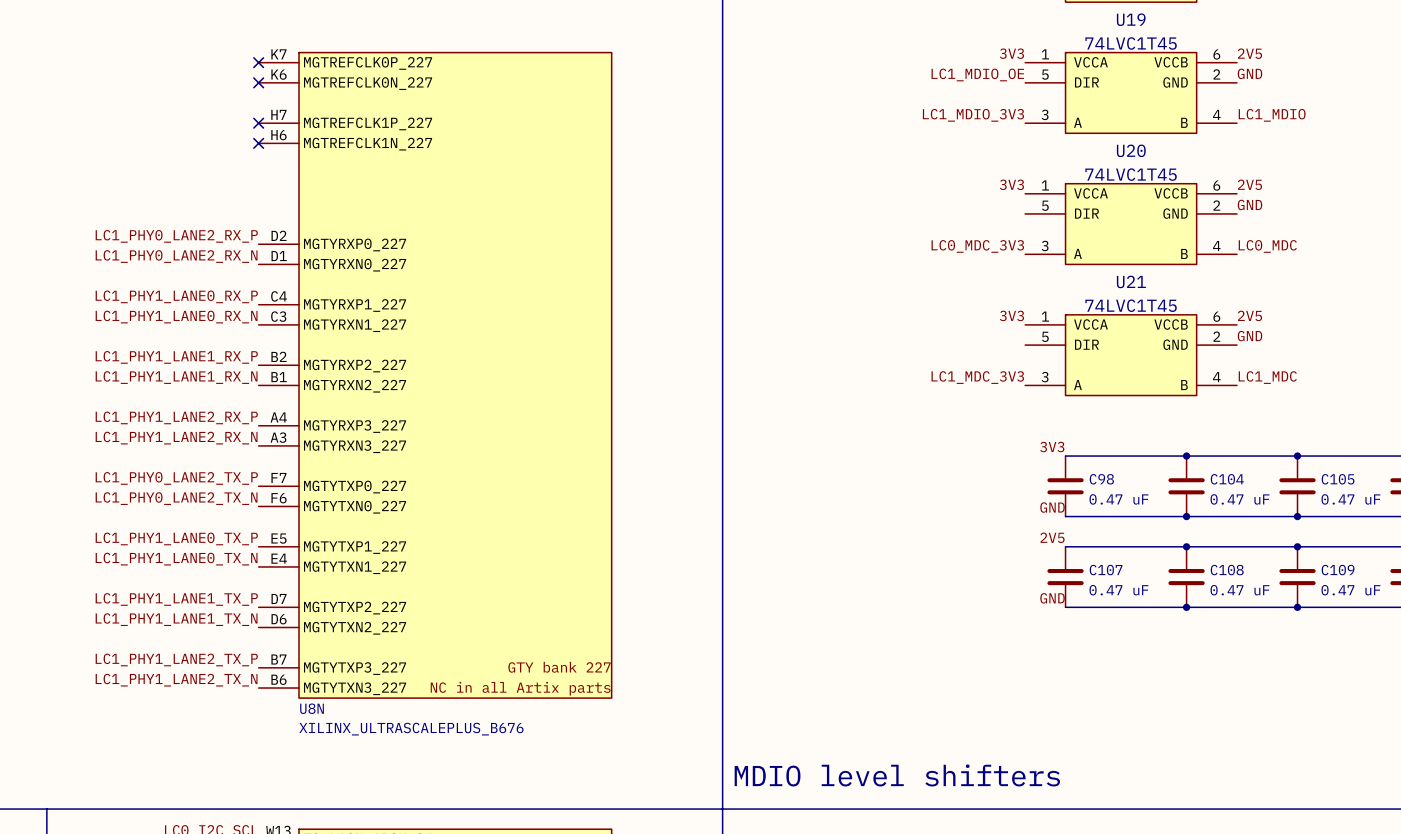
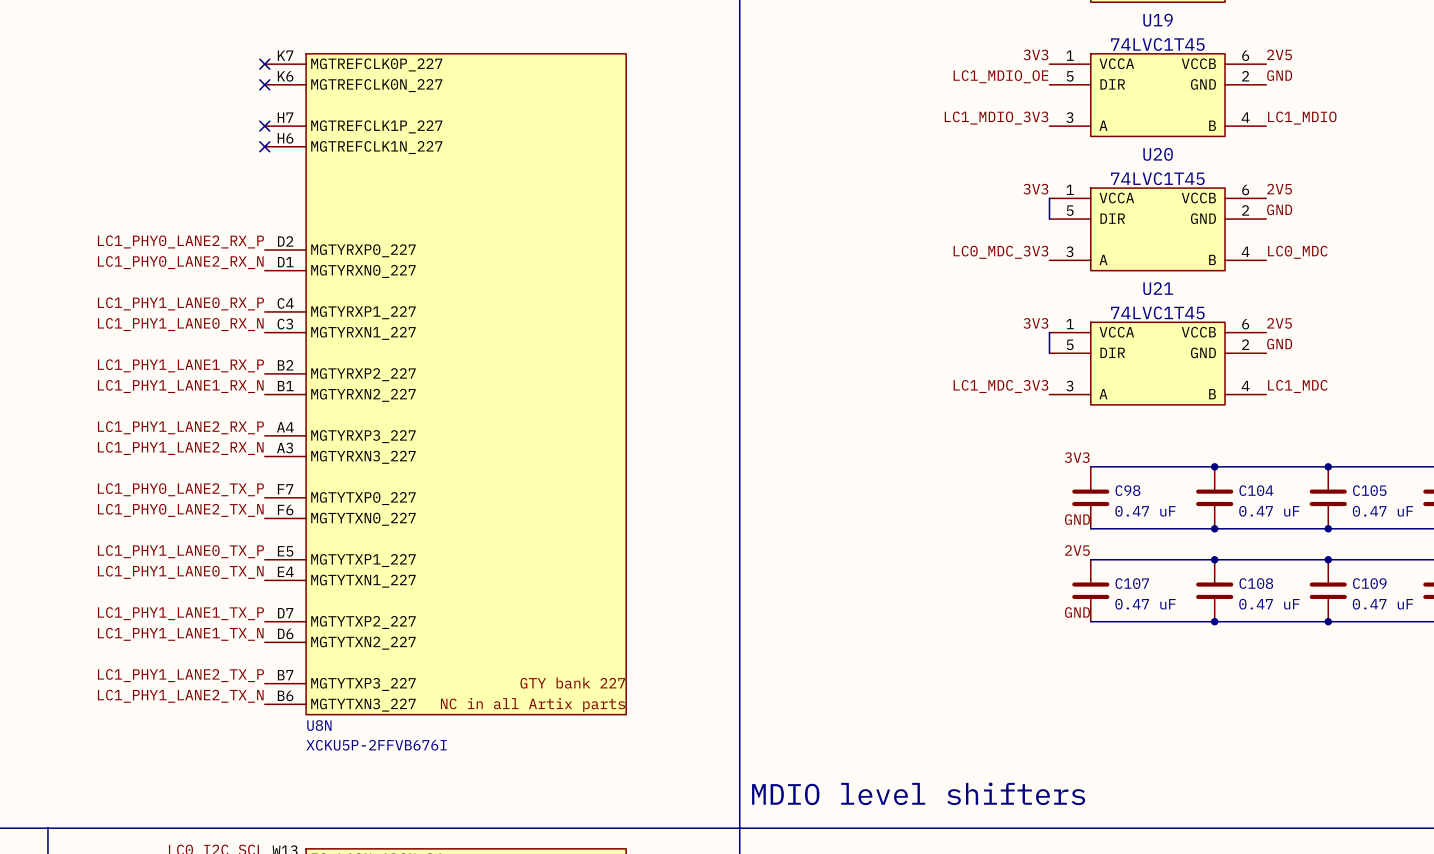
wire: none -> (1049, 198) (1049, 219)
wire: none -> (1049, 332) (1049, 353)
U8N value: XILINX_ULTRASCALEPLUS_B676 (411, 729) -> XCKU5P-2FFVB676I (376, 745)

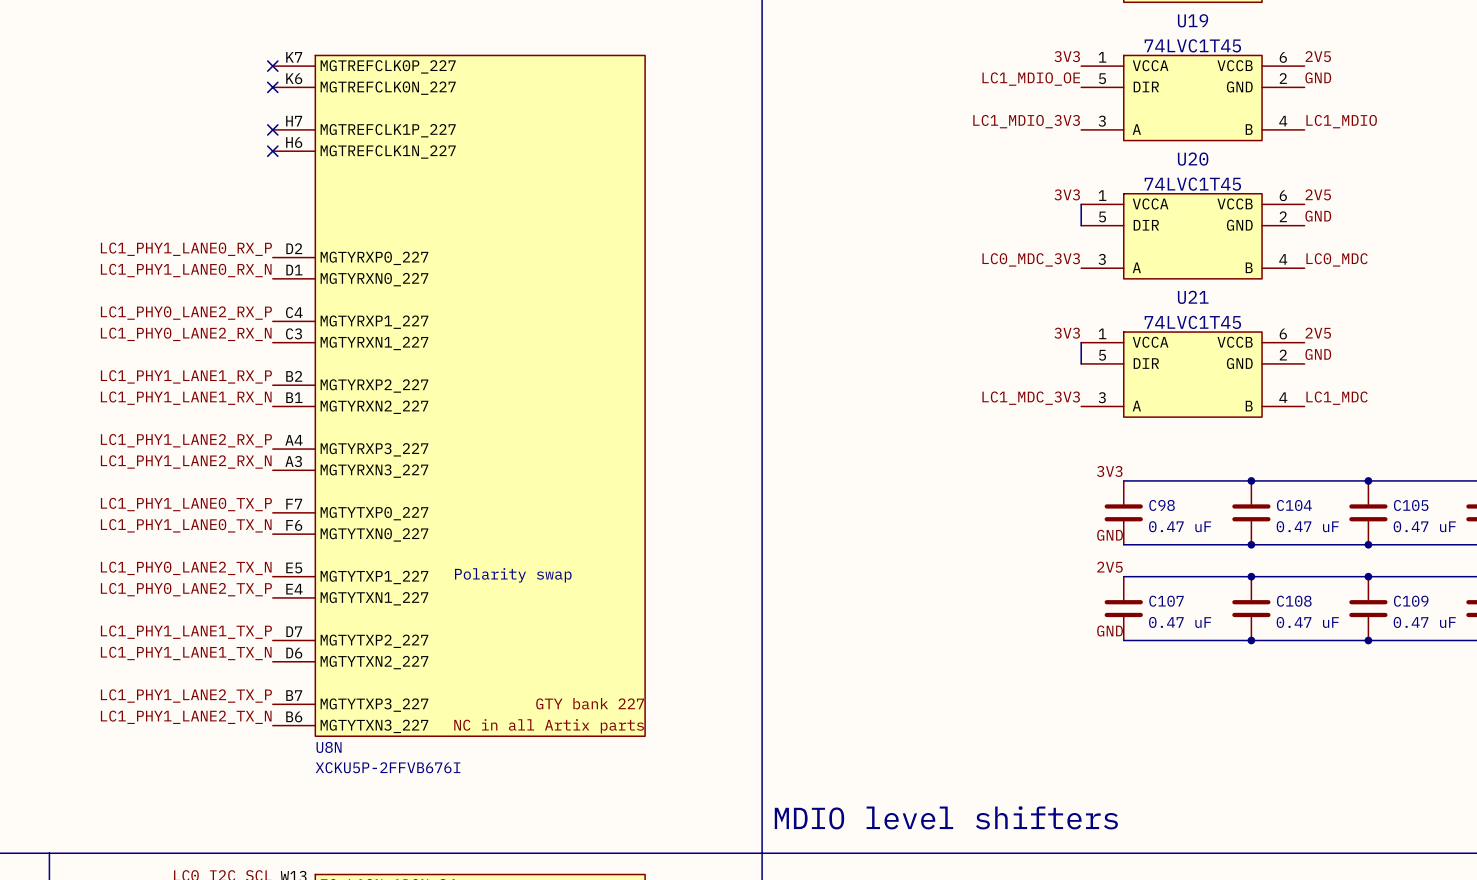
label: LC1_PHY0_LANE2_RX_P (180, 241) -> LC1_PHY1_LANE0_RX_P (186, 249)
label: LC1_PHY0_LANE2_RX_N (180, 262) -> LC1_PHY1_LANE0_RX_N (186, 270)
label: LC1_PHY1_LANE0_RX_P (180, 303) -> LC1_PHY0_LANE2_RX_P (186, 313)
label: LC1_PHY1_LANE0_RX_N (180, 324) -> LC1_PHY0_LANE2_RX_N (186, 334)
label: LC1_PHY0_LANE2_TX_P (180, 489) -> LC1_PHY1_LANE0_TX_P (186, 504)
label: LC1_PHY0_LANE2_TX_N (180, 510) -> LC1_PHY1_LANE0_TX_N (186, 525)
label: LC1_PHY1_LANE0_TX_P (180, 551) -> LC1_PHY0_LANE2_TX_N (186, 568)
text: none -> Polarity swap (513, 575)
label: LC1_PHY1_LANE0_TX_N (180, 572) -> LC1_PHY0_LANE2_TX_P (186, 589)

